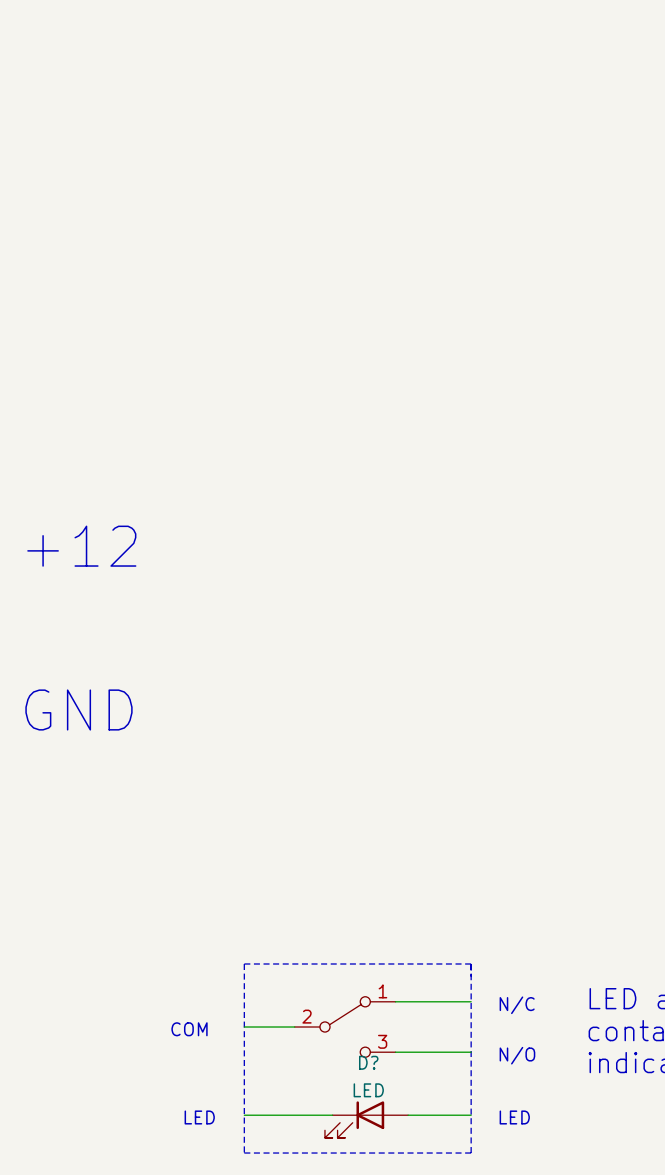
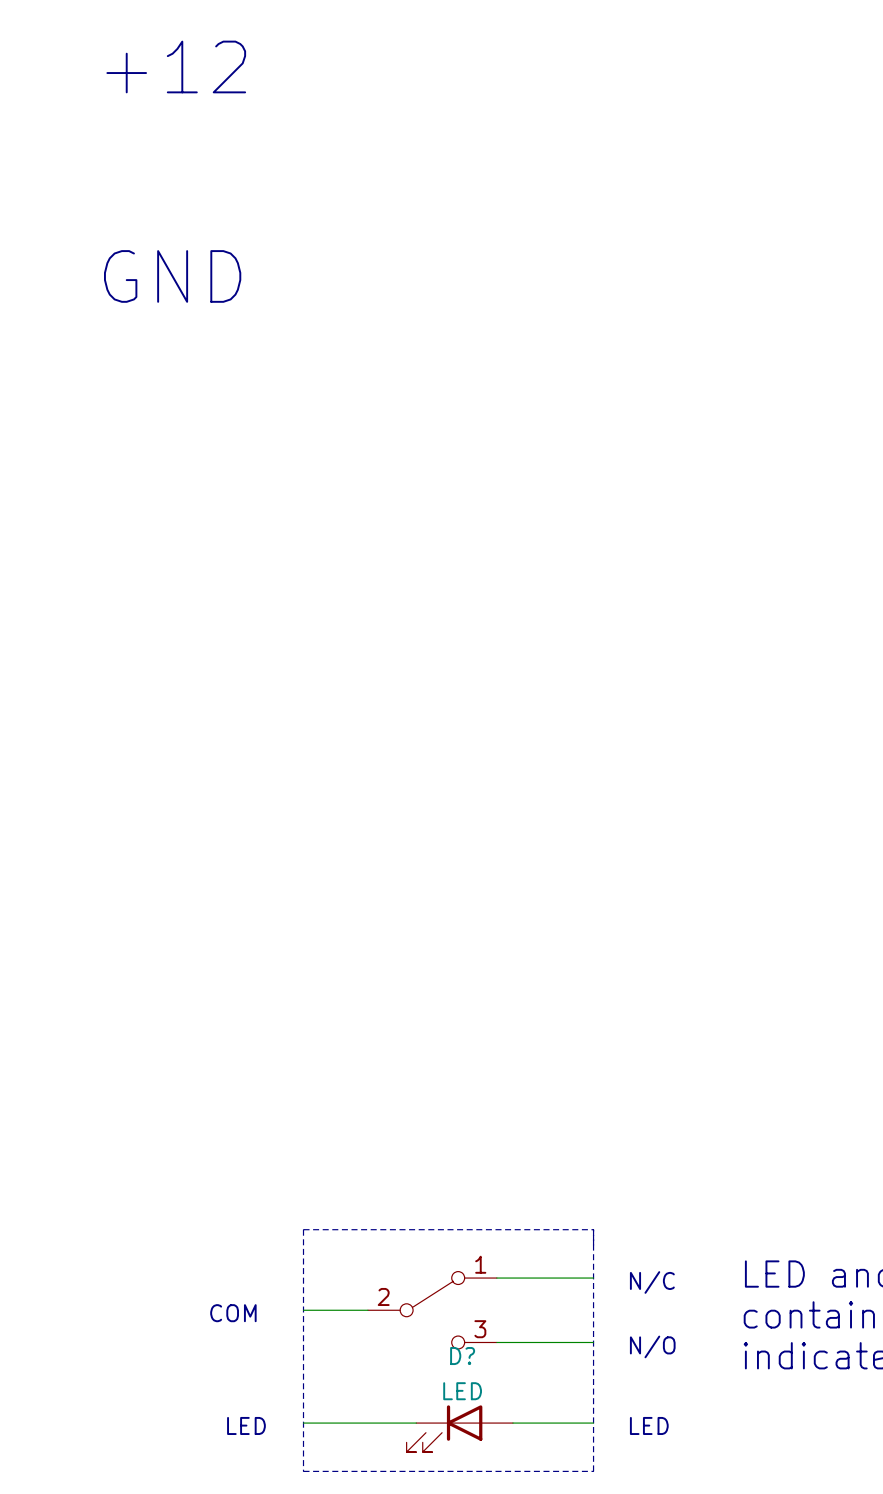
text: none -> +12 (176, 66)
text: none -> GND (172, 276)
text: +12 (81, 546) -> none
text: GND (78, 709) -> none

